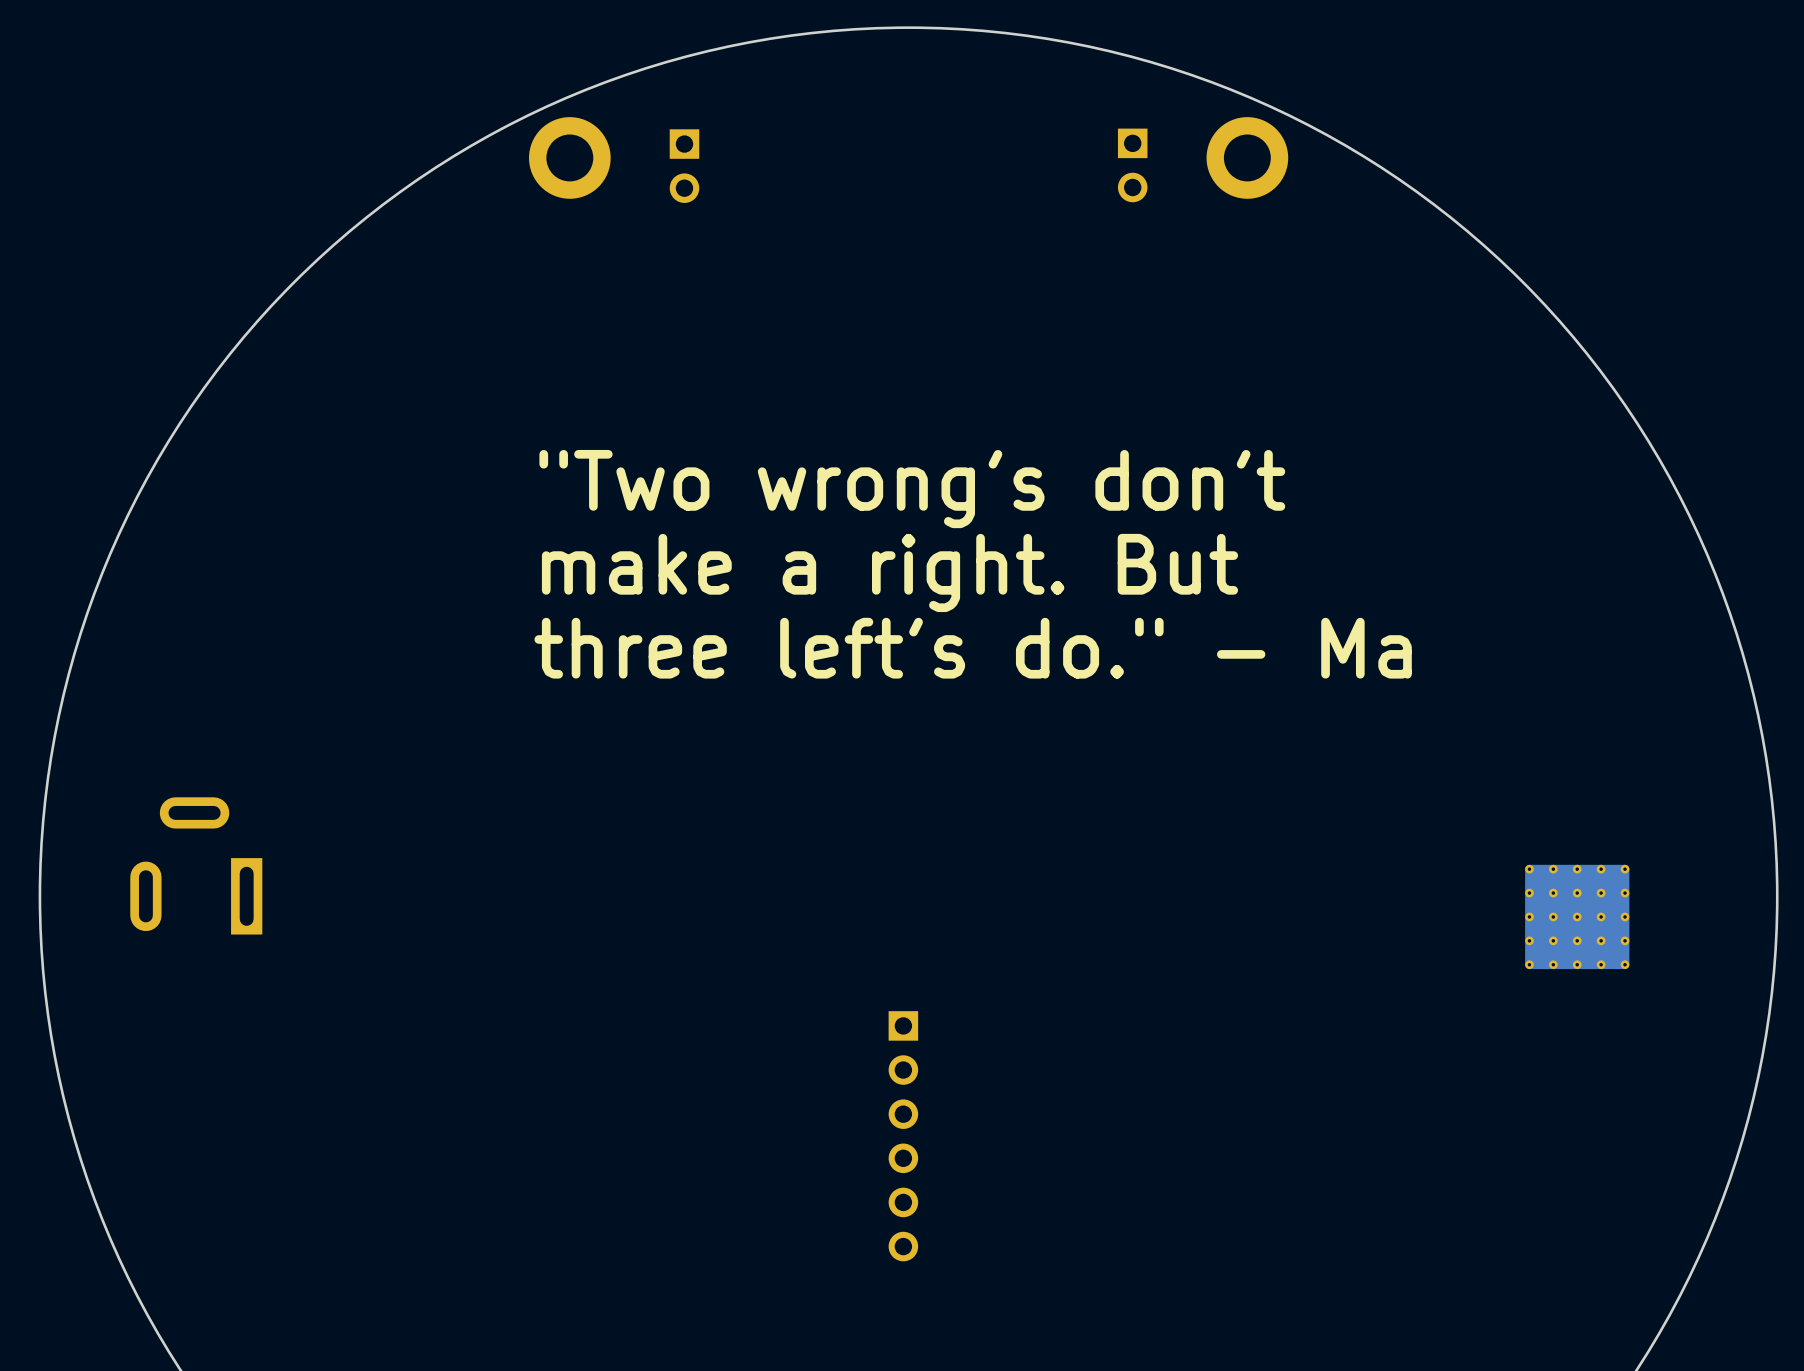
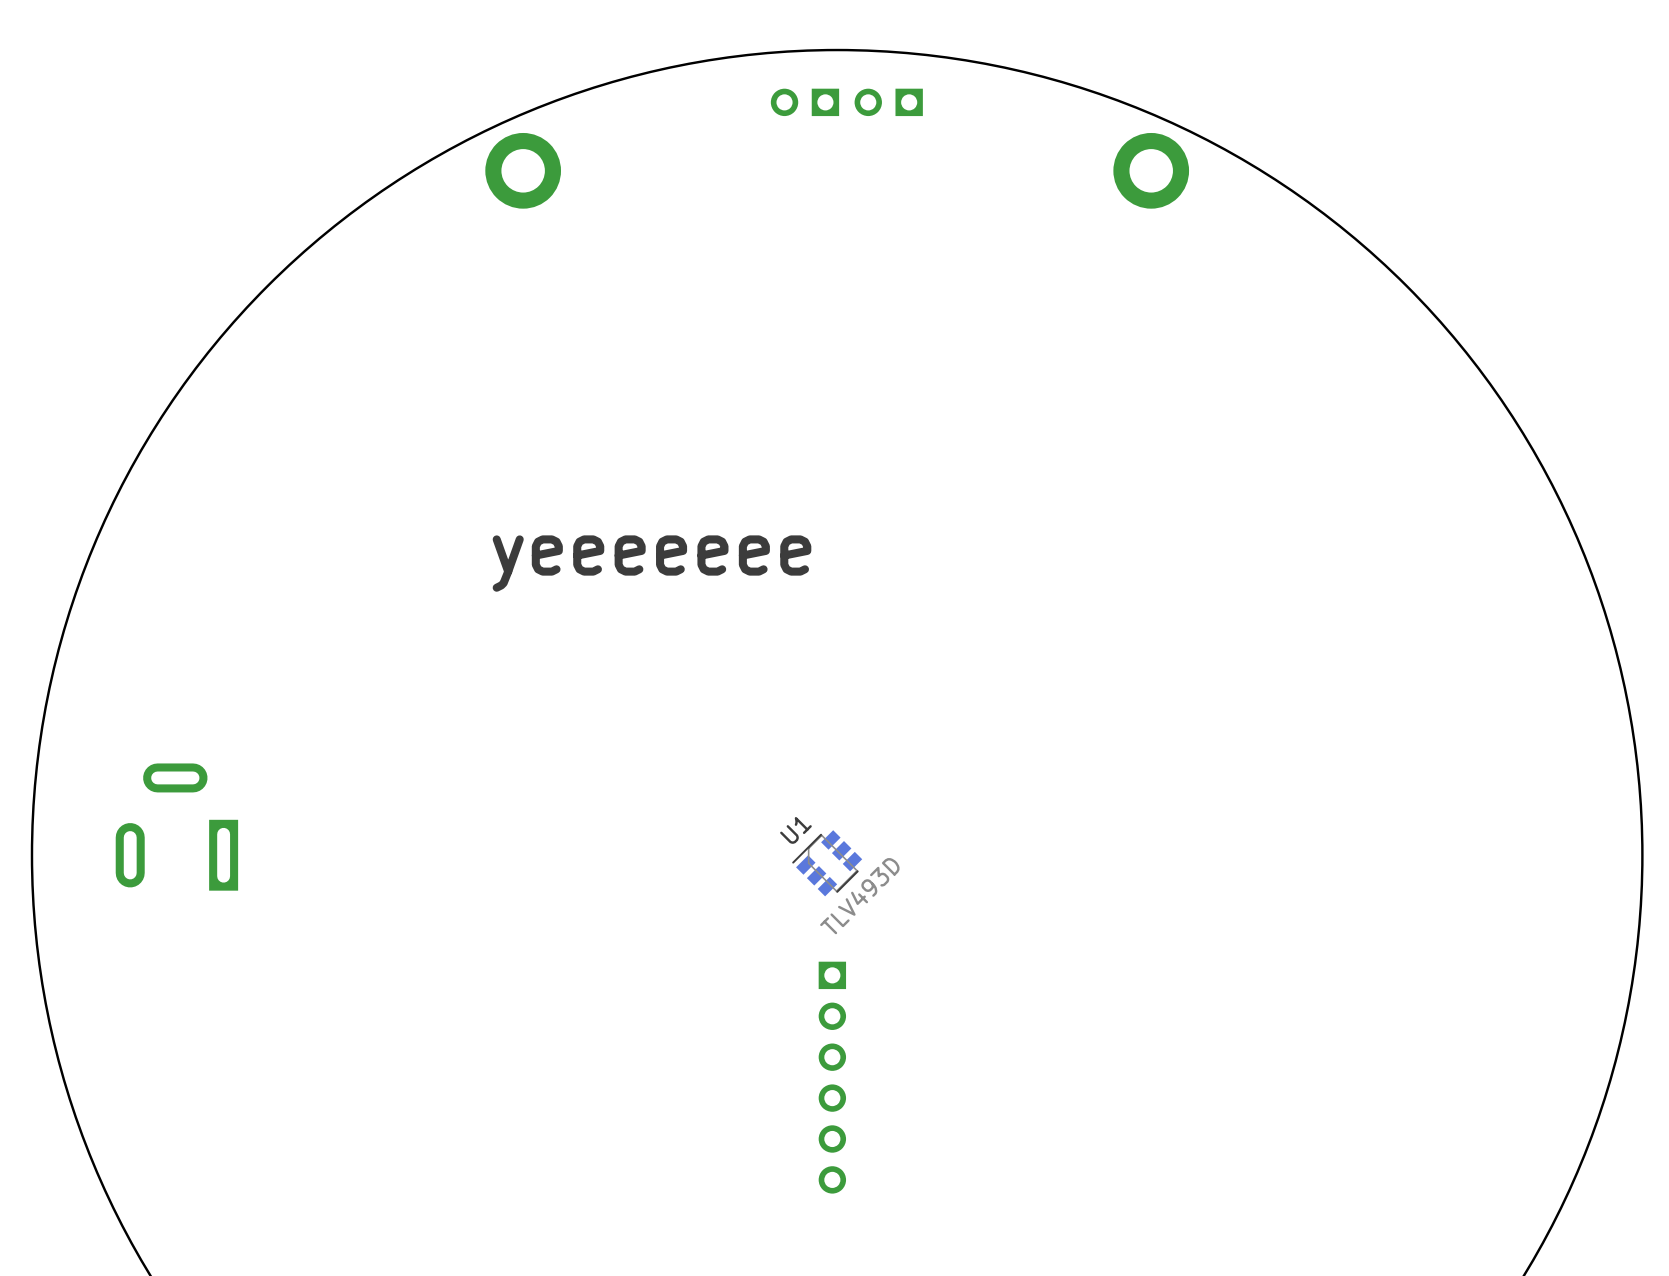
part: none -> (804, 102)
part: none -> (888, 102)
part: (1132, 165) -> none
part: (684, 166) -> none
text: "Two wrong's don't (912, 489) -> none
text: make a right. But (889, 572) -> yeeeeeee (652, 563)
text: three left's do." - Ma (973, 648) -> none
U1: none -> TLV493D (827, 863)
part: (1577, 916) -> none

